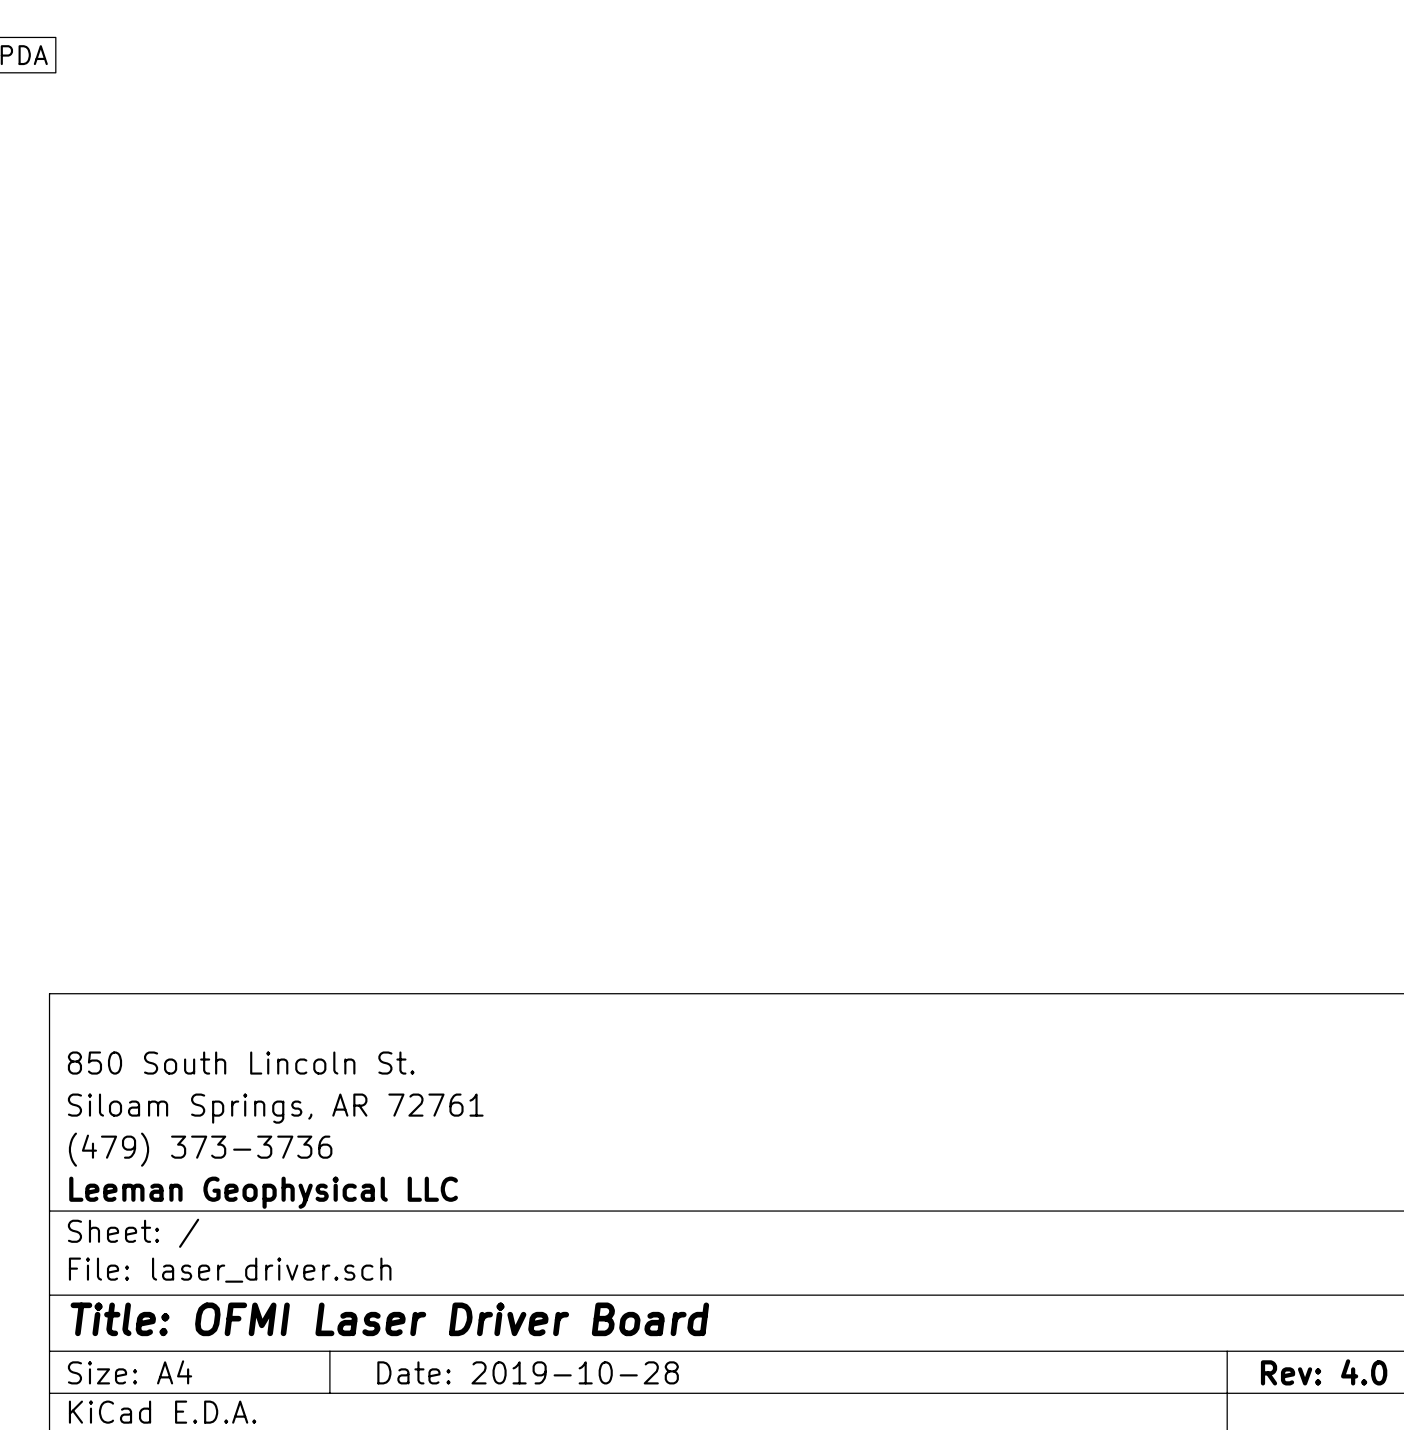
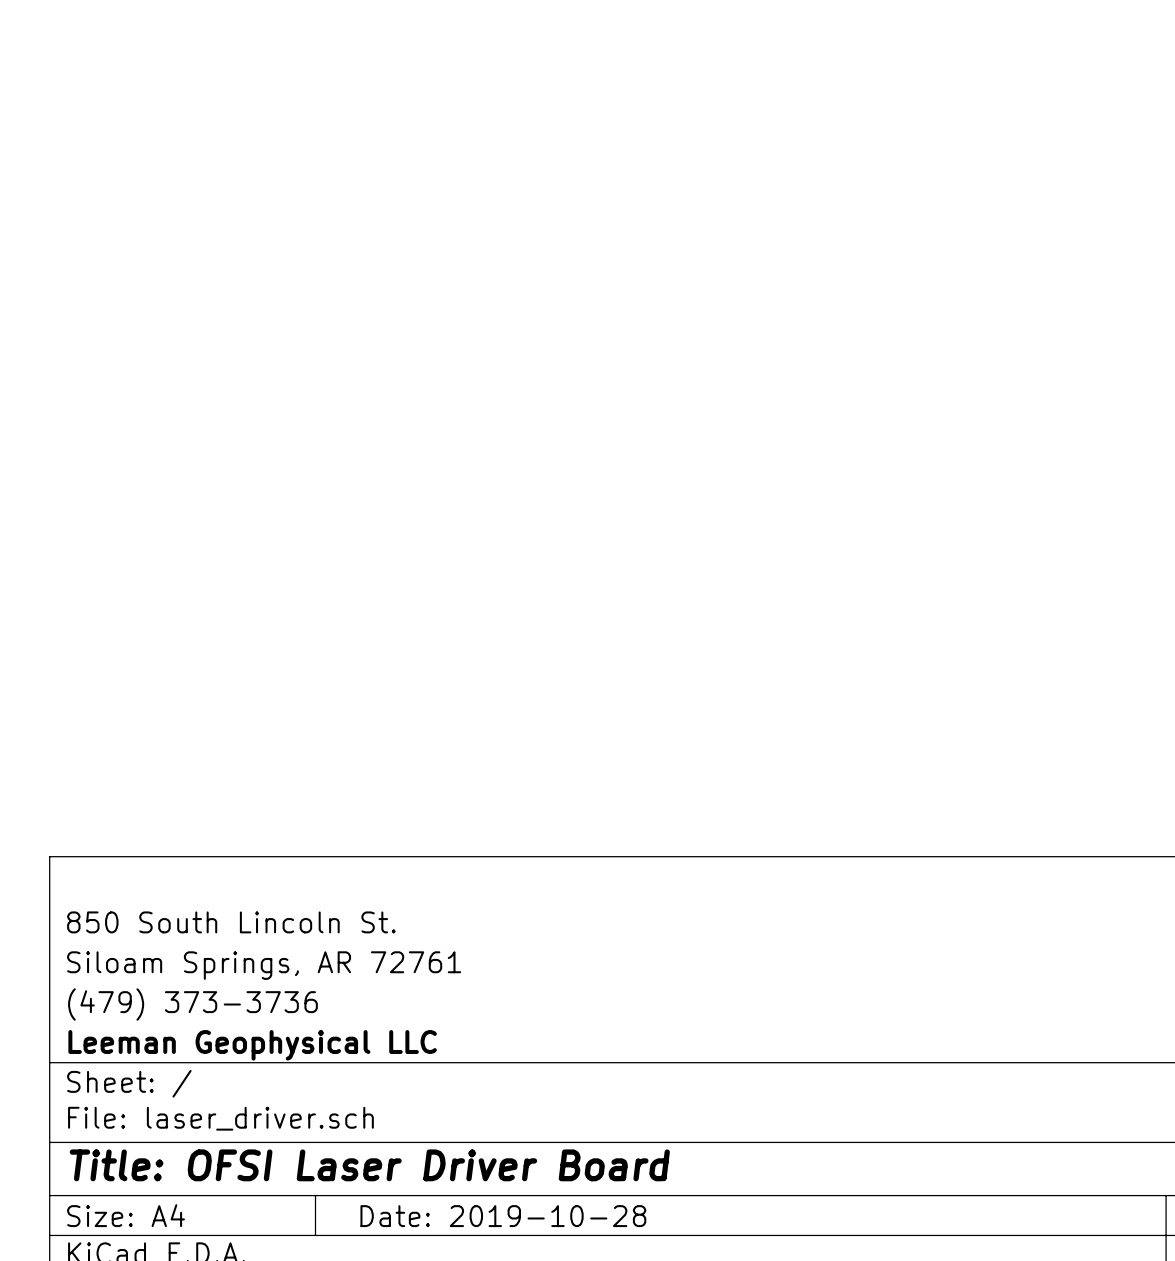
title block: Title: OFMI Laser Driver Board (389, 1319) -> Title: OFSI Laser Driver Board (369, 1165)

